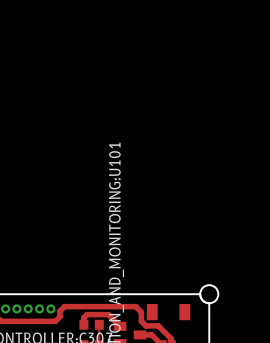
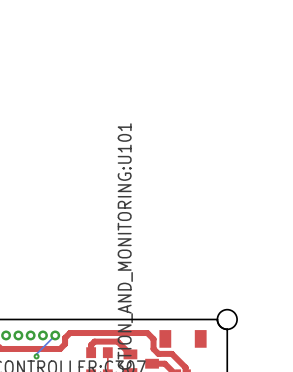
bottom track: none -> (55, 335) (36, 354) (36, 356)
via: none -> (36, 356)

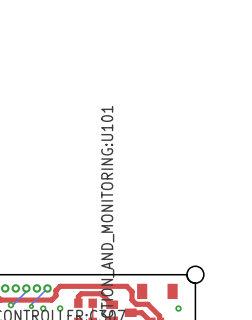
bottom track: none -> (26, 288) (26, 291) (10, 305)
via: none -> (10, 305)
via: none -> (43, 308)
via: none -> (60, 308)
via: none -> (178, 308)

